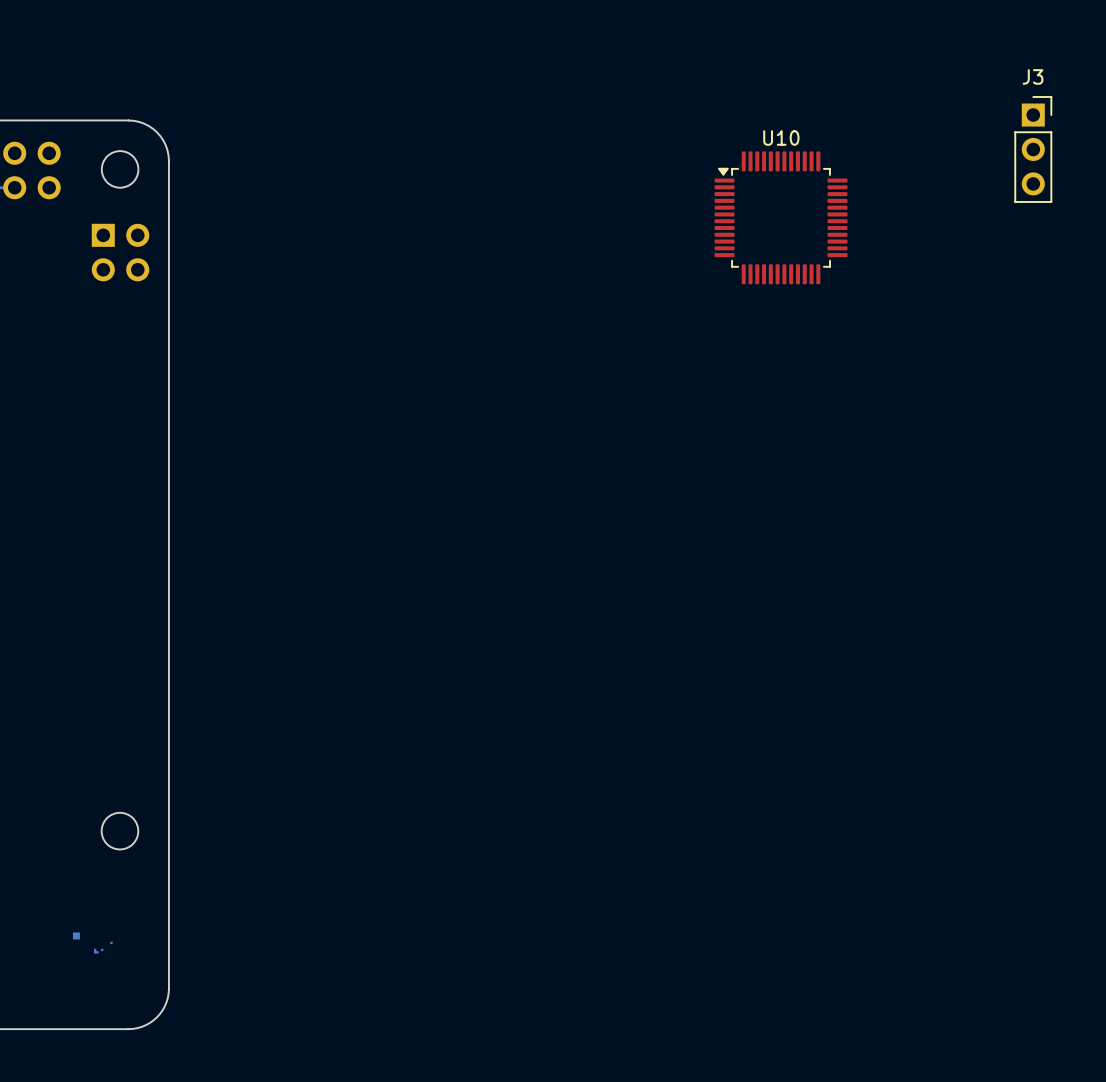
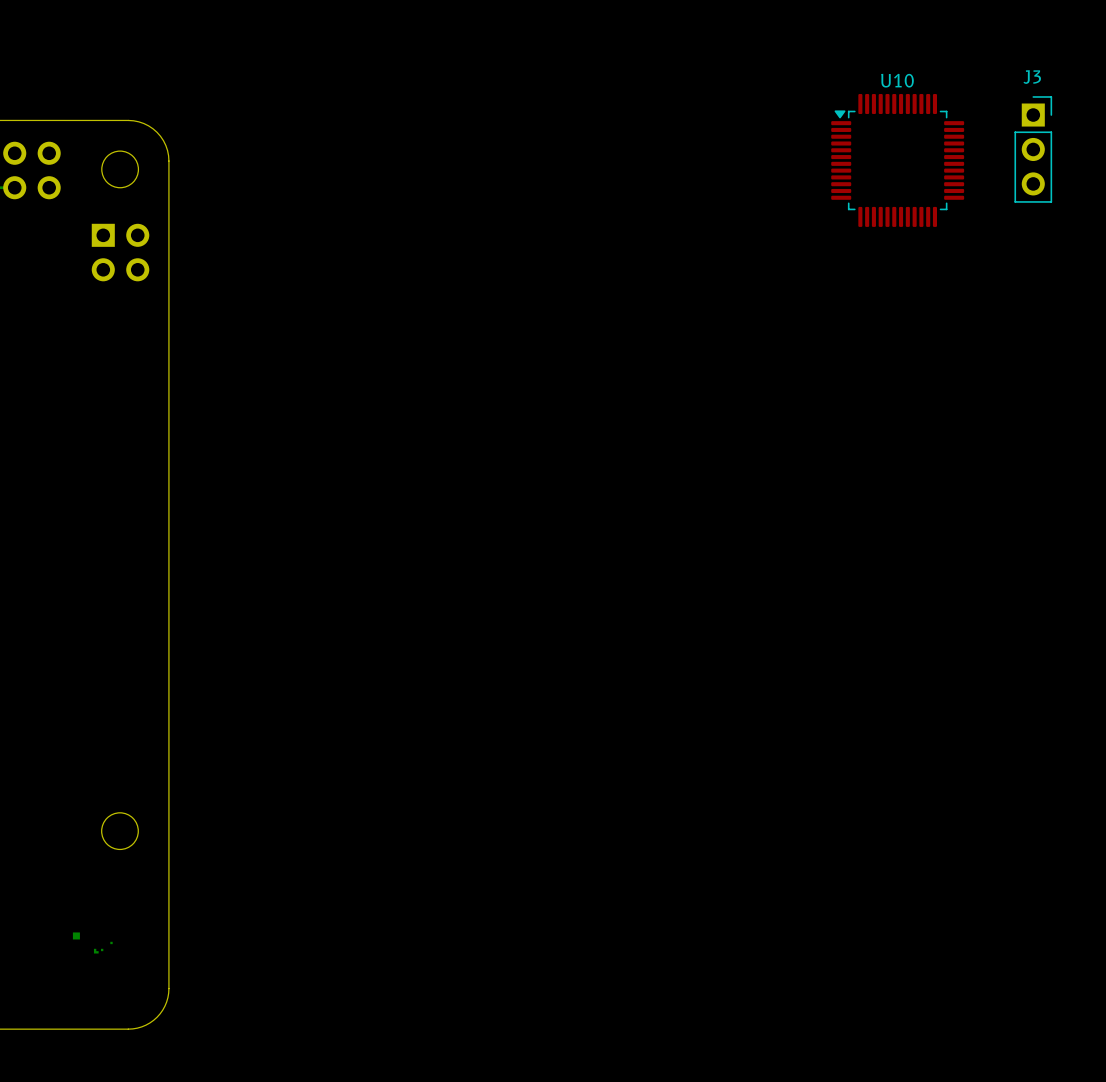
U10 position: (781, 217) -> (897, 160)

